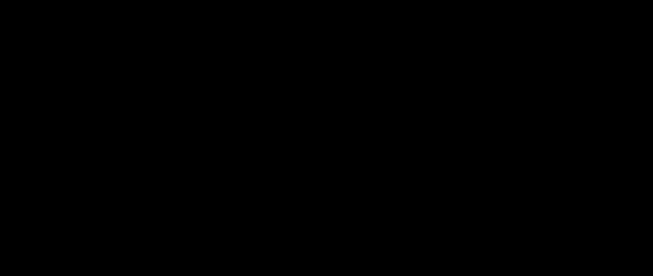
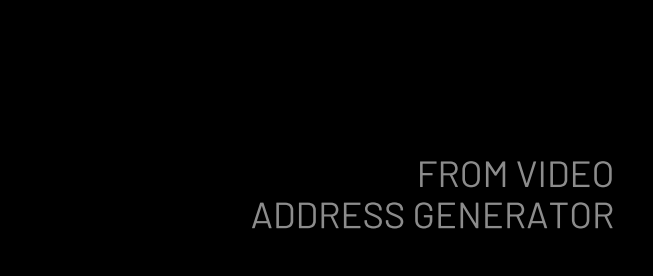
text: none -> FROM VIDEO (515, 174)
text: none -> ADDRESS GENERATOR (432, 215)

